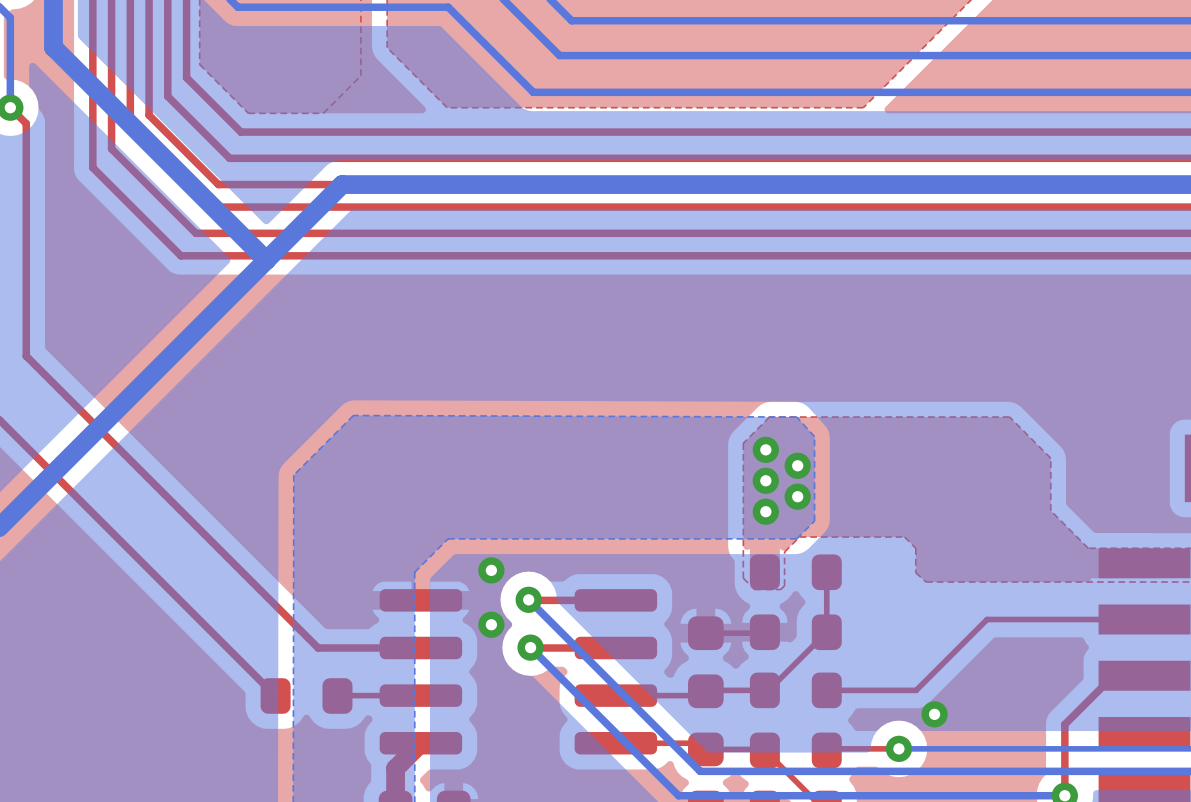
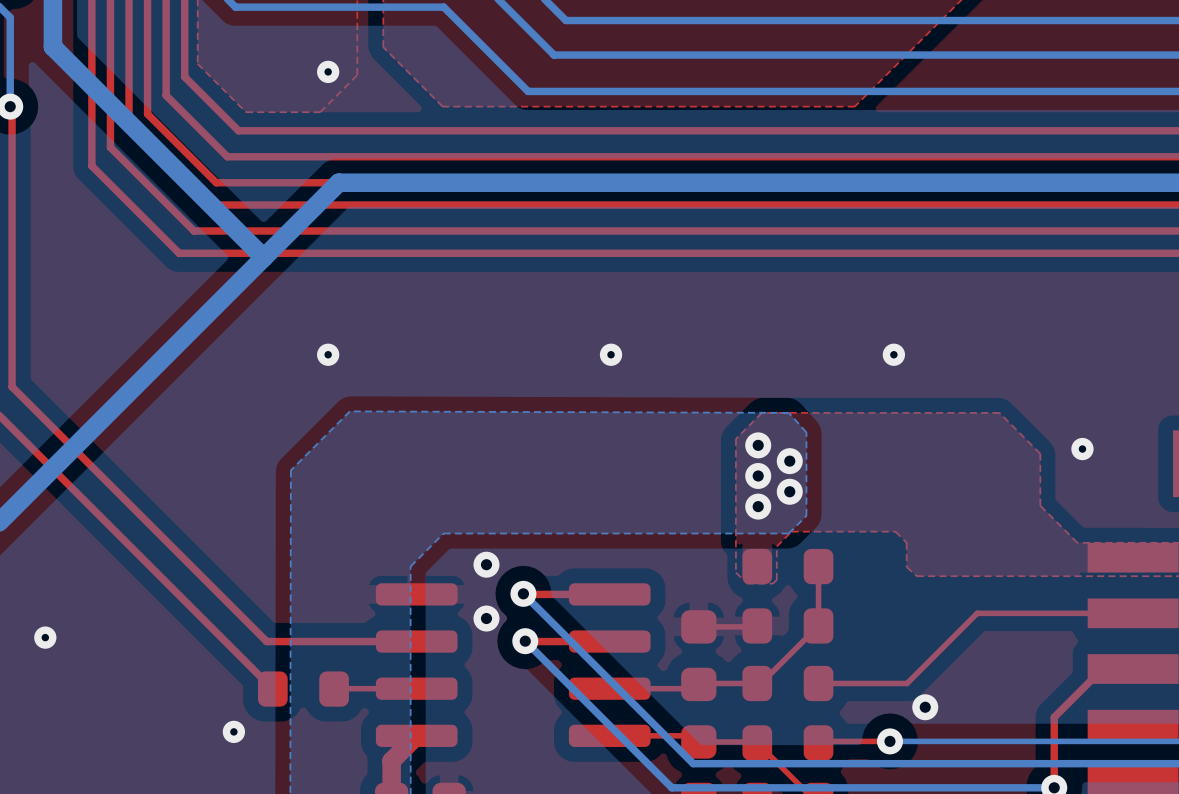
via: none -> (328, 71)
top track: (12, 109) (26, 123) (26, 356) (318, 648) -> (12, 108) (12, 386) (266, 641) (314, 641)
via: none -> (328, 354)
via: none -> (611, 354)
via: none -> (893, 354)
via: none -> (1082, 449)
via: none -> (45, 637)
via: none -> (233, 731)

